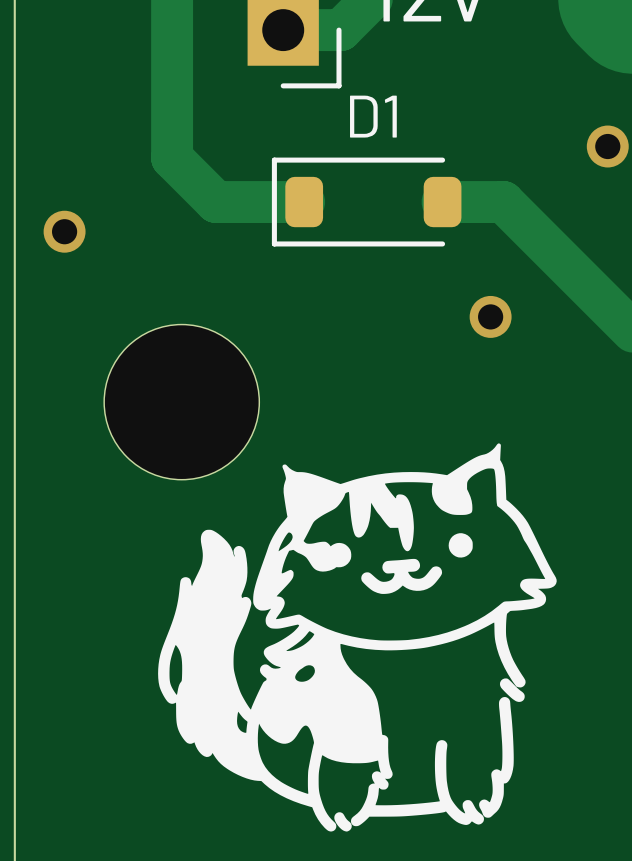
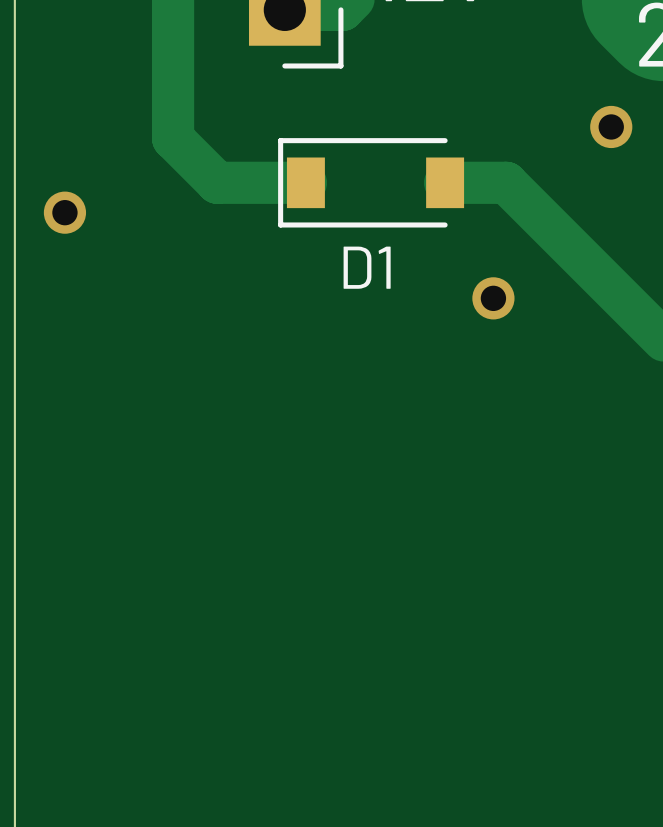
D1 name position: D1 (373, 116) -> D1 (367, 267)
D1 footprint: [271, 157, 462, 247] -> [278, 138, 465, 228]
part: (181, 402) -> none
drawing: [158, 443, 557, 832] -> none

